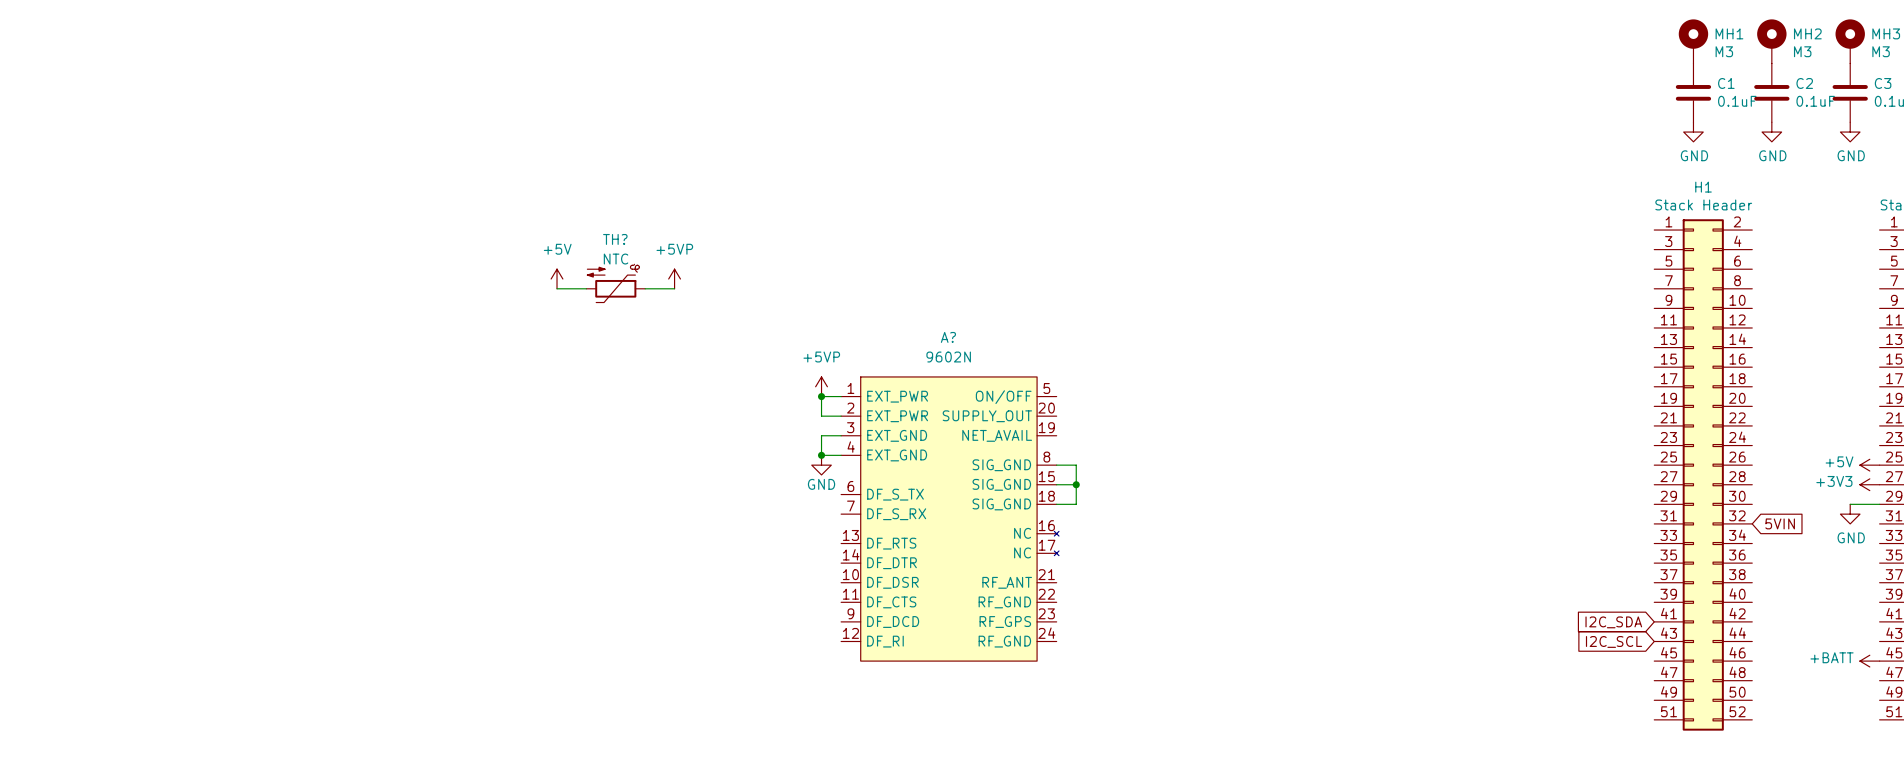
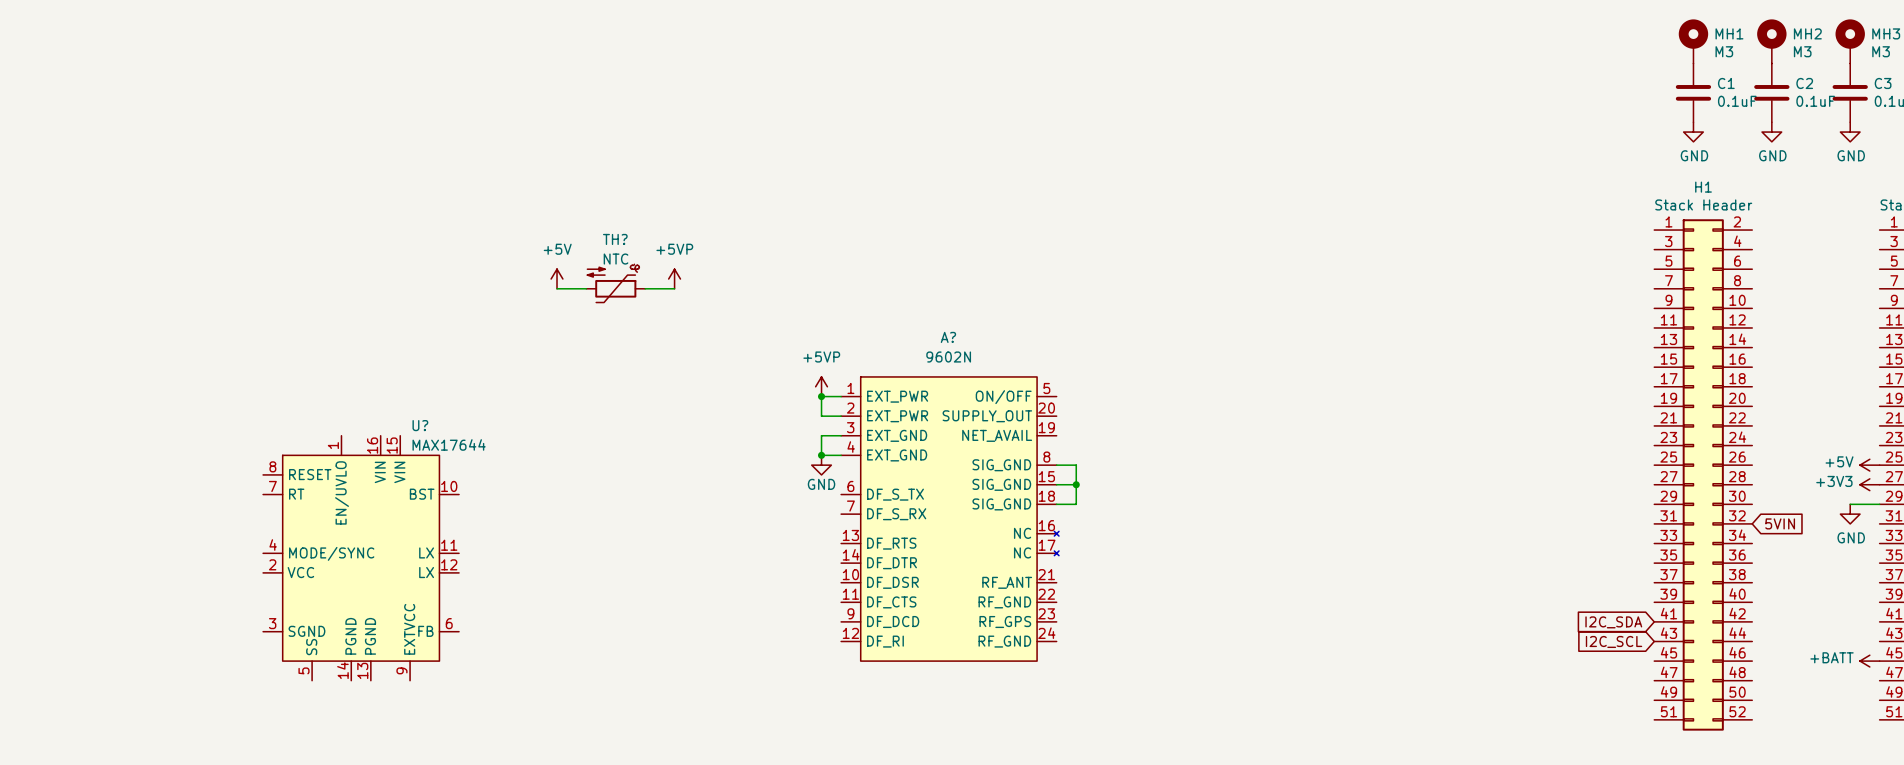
U?: none -> MAX17644 (361, 558)

